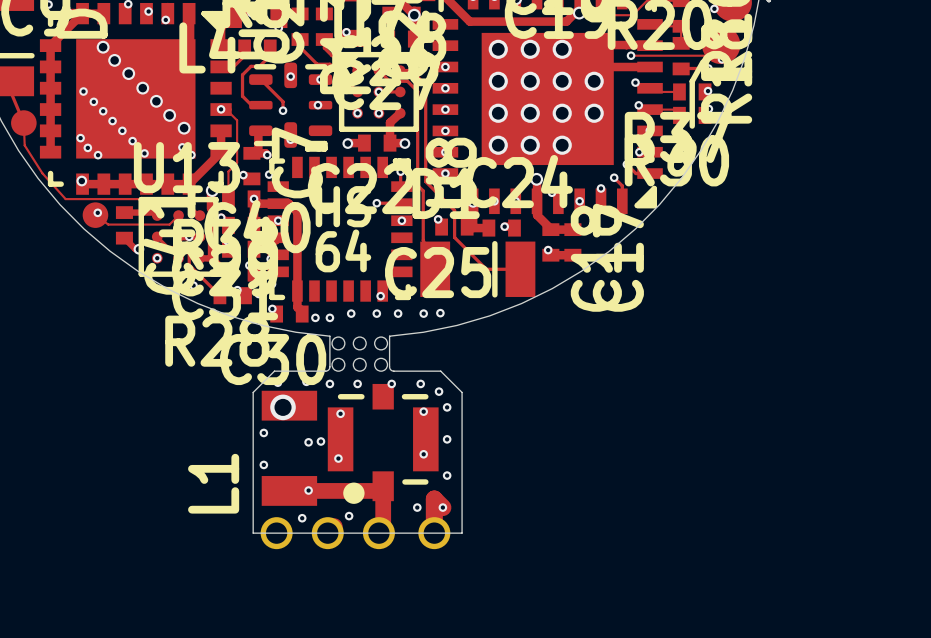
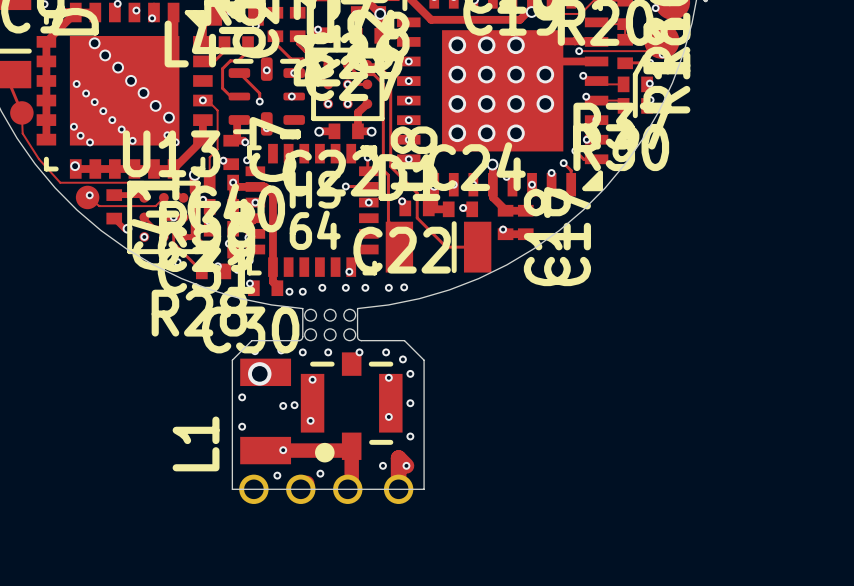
C25 name: C25 (438, 272) -> C22 (402, 250)

